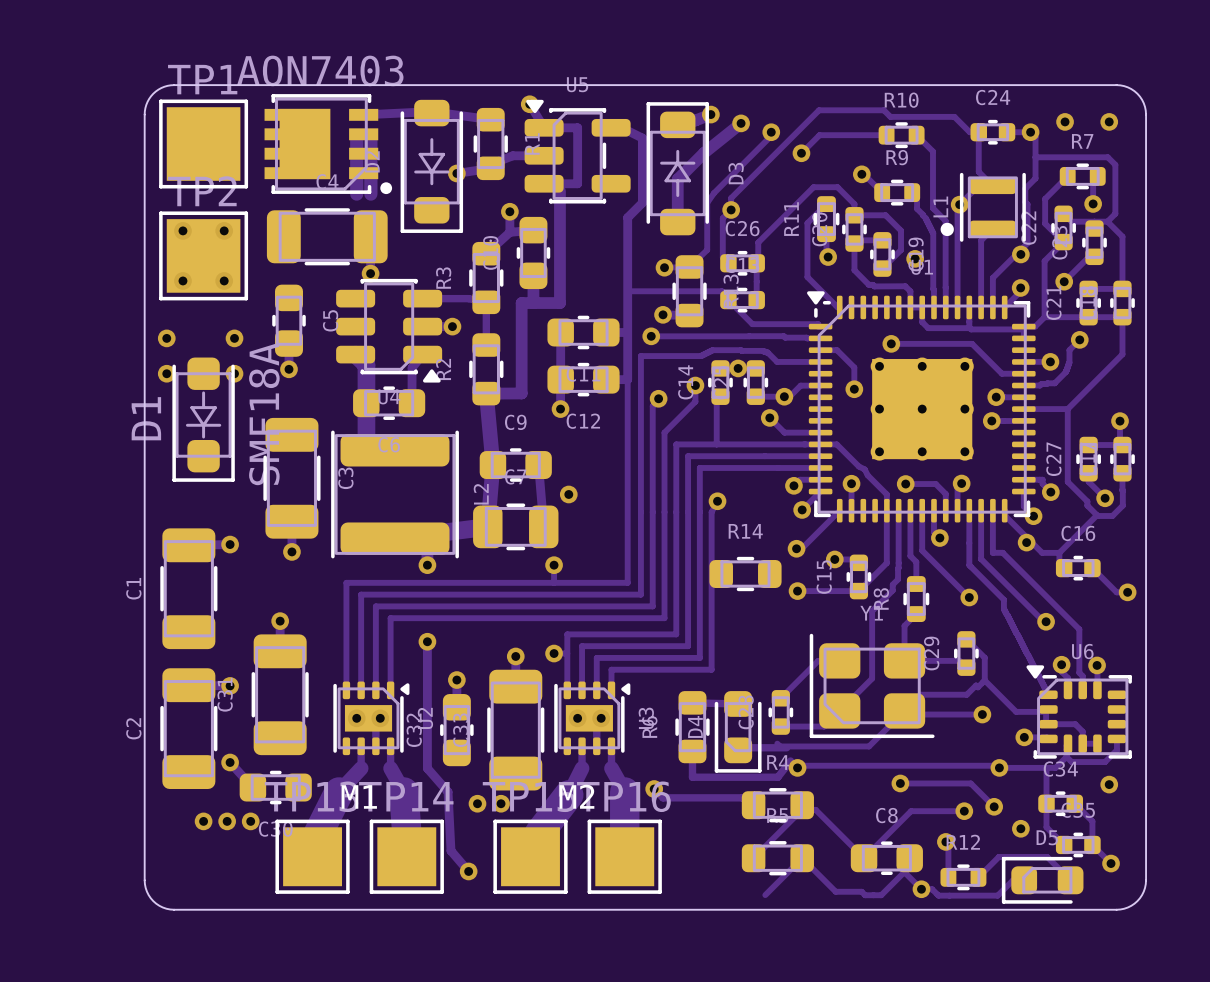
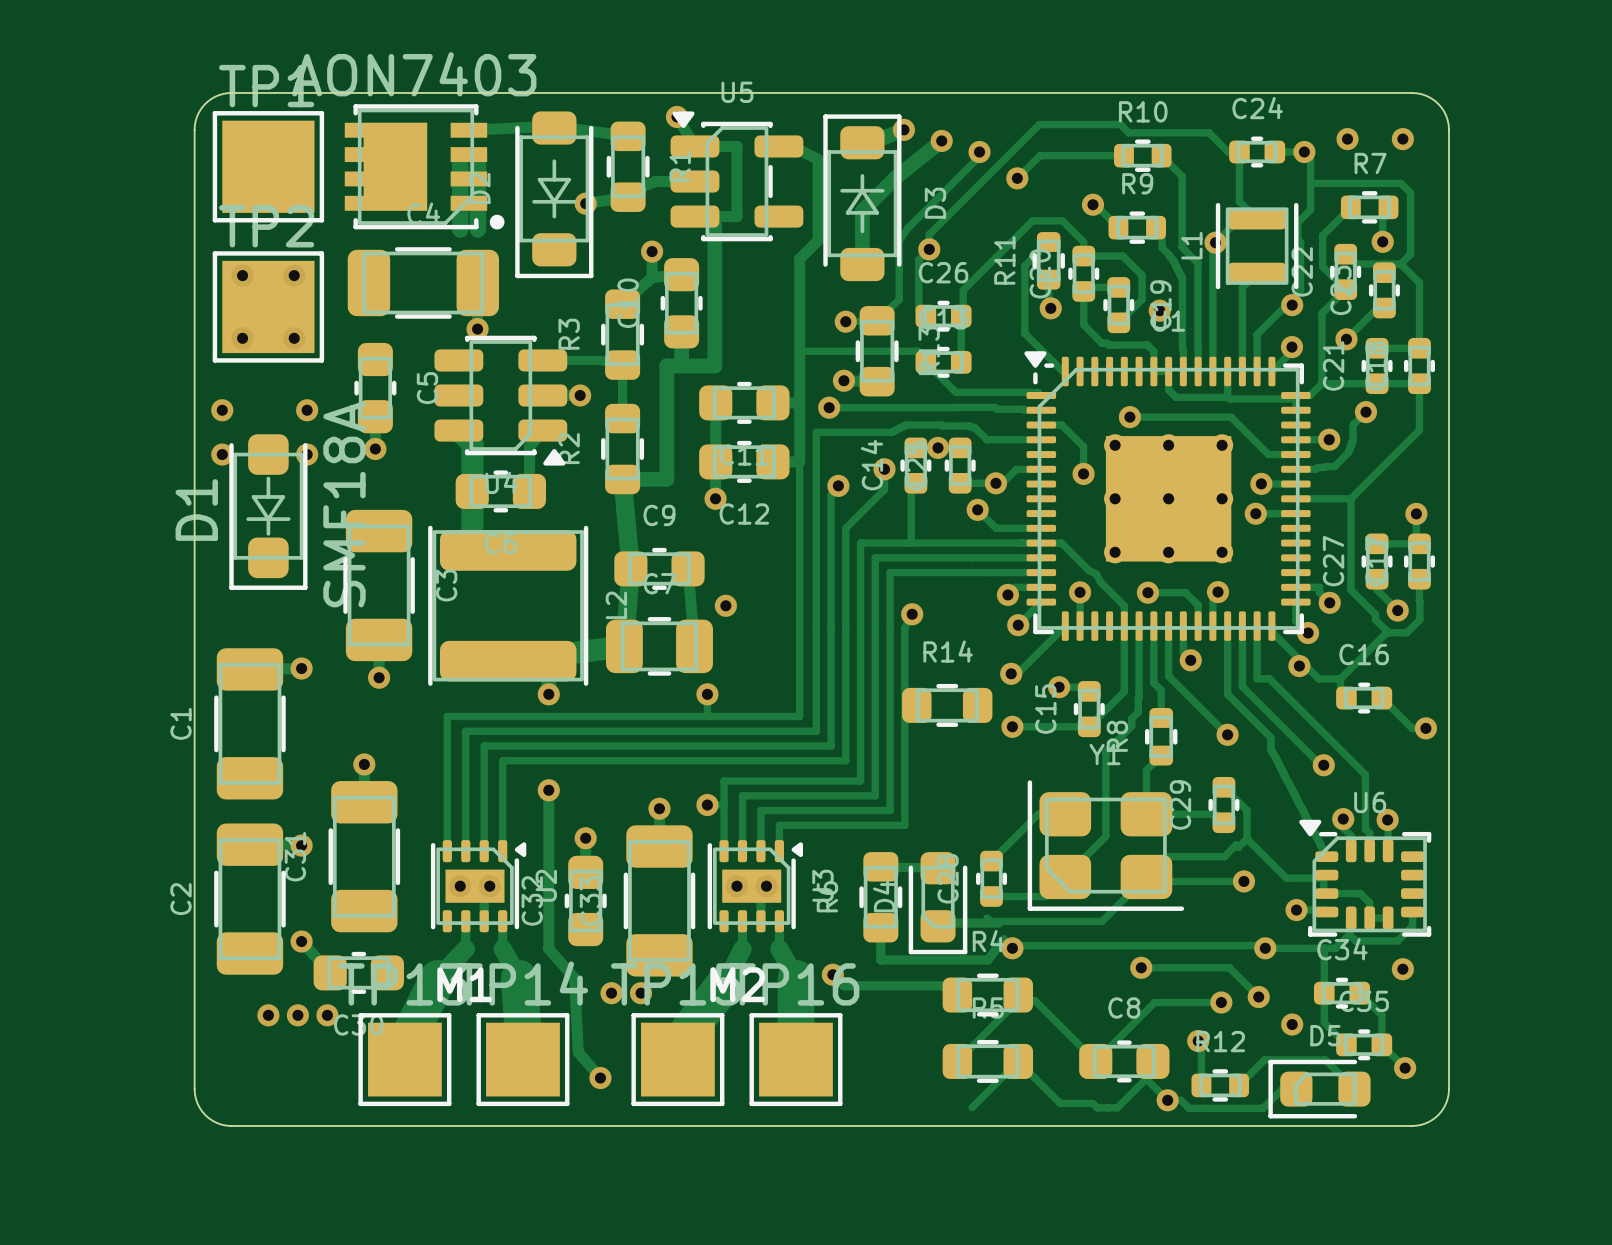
drawing: [940, 222, 954, 237] -> none

